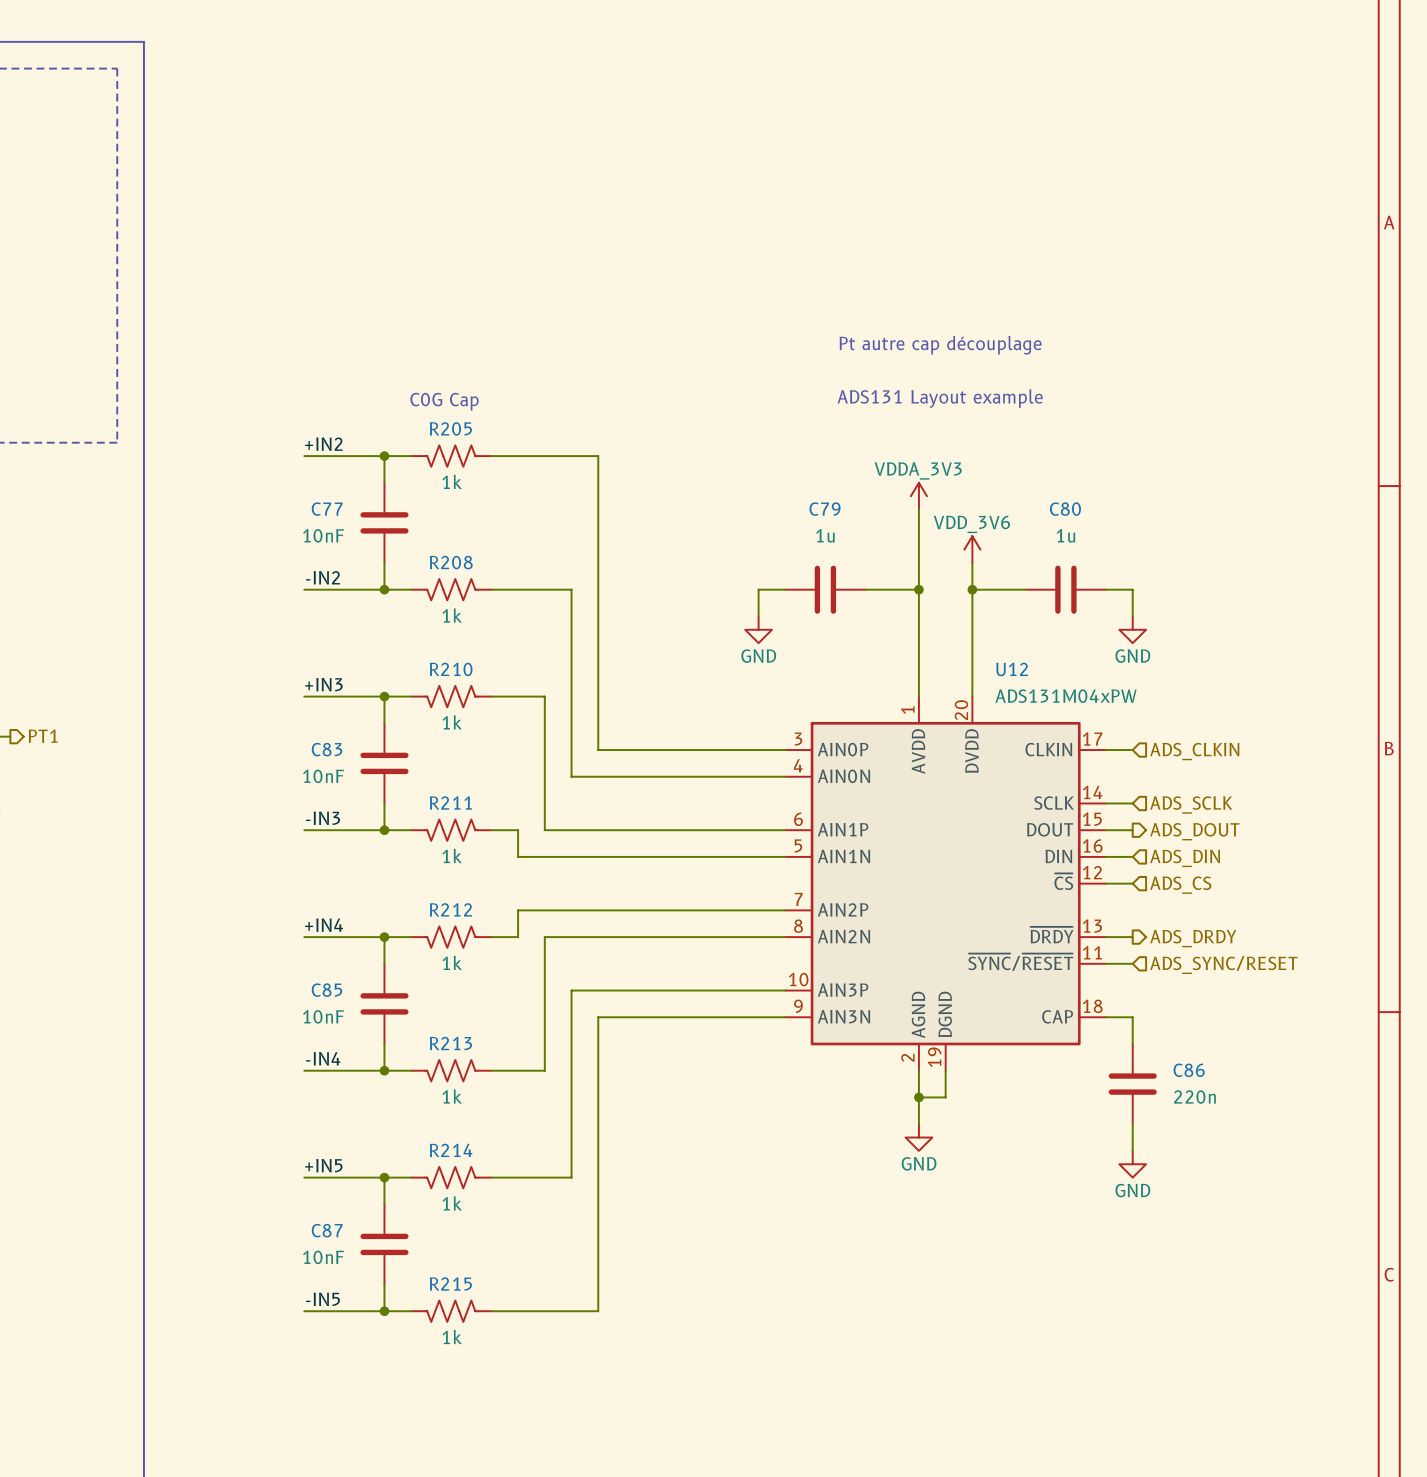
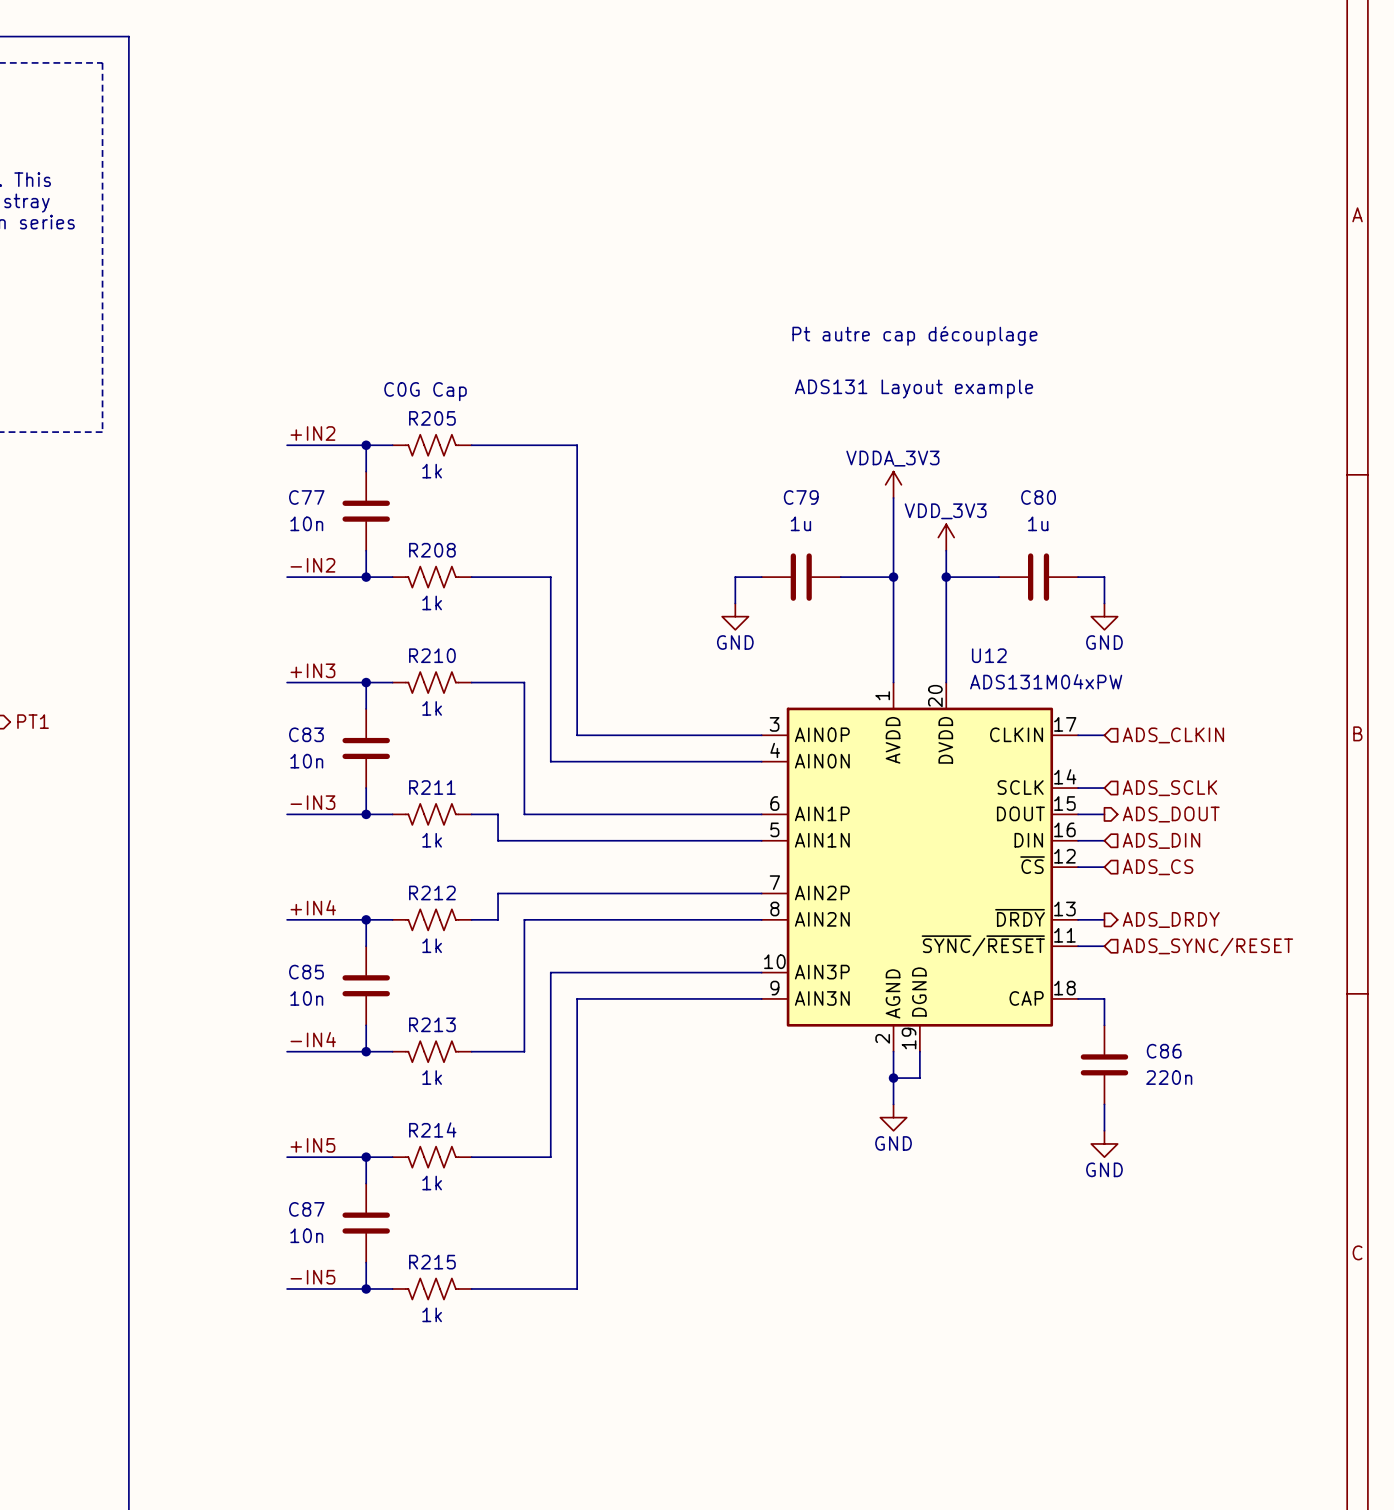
C77 value: 10nF (323, 535) -> 10n (306, 523)
power symbol: VDD_3V6 (972, 549) -> VDD_3V3 (946, 537)
C83 value: 10nF (323, 776) -> 10n (306, 761)
C85 value: 10nF (323, 1016) -> 10n (306, 998)
C87 value: 10nF (323, 1257) -> 10n (306, 1235)

